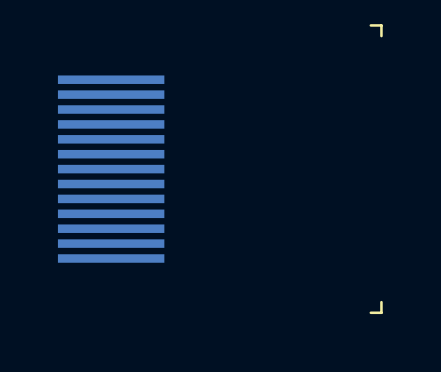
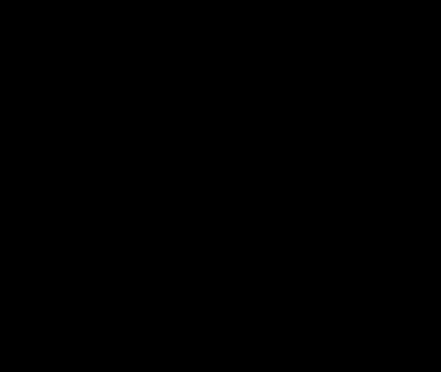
line: (370, 25) (381, 25) (381, 36) -> none
part: (111, 169) -> none
line: (381, 302) (381, 312) (370, 312) -> none

